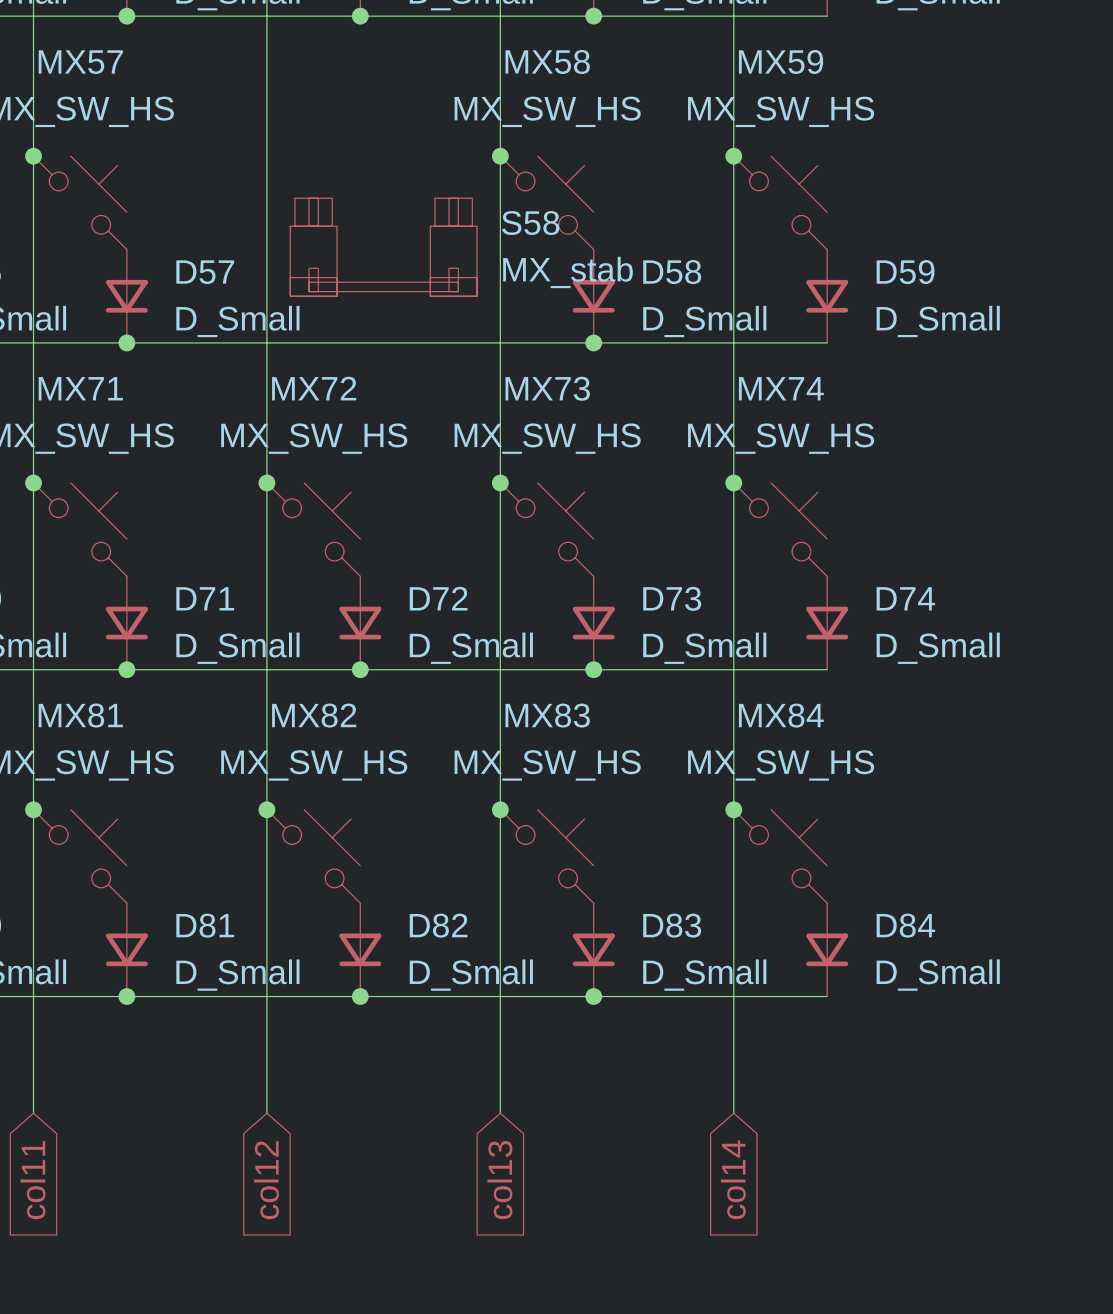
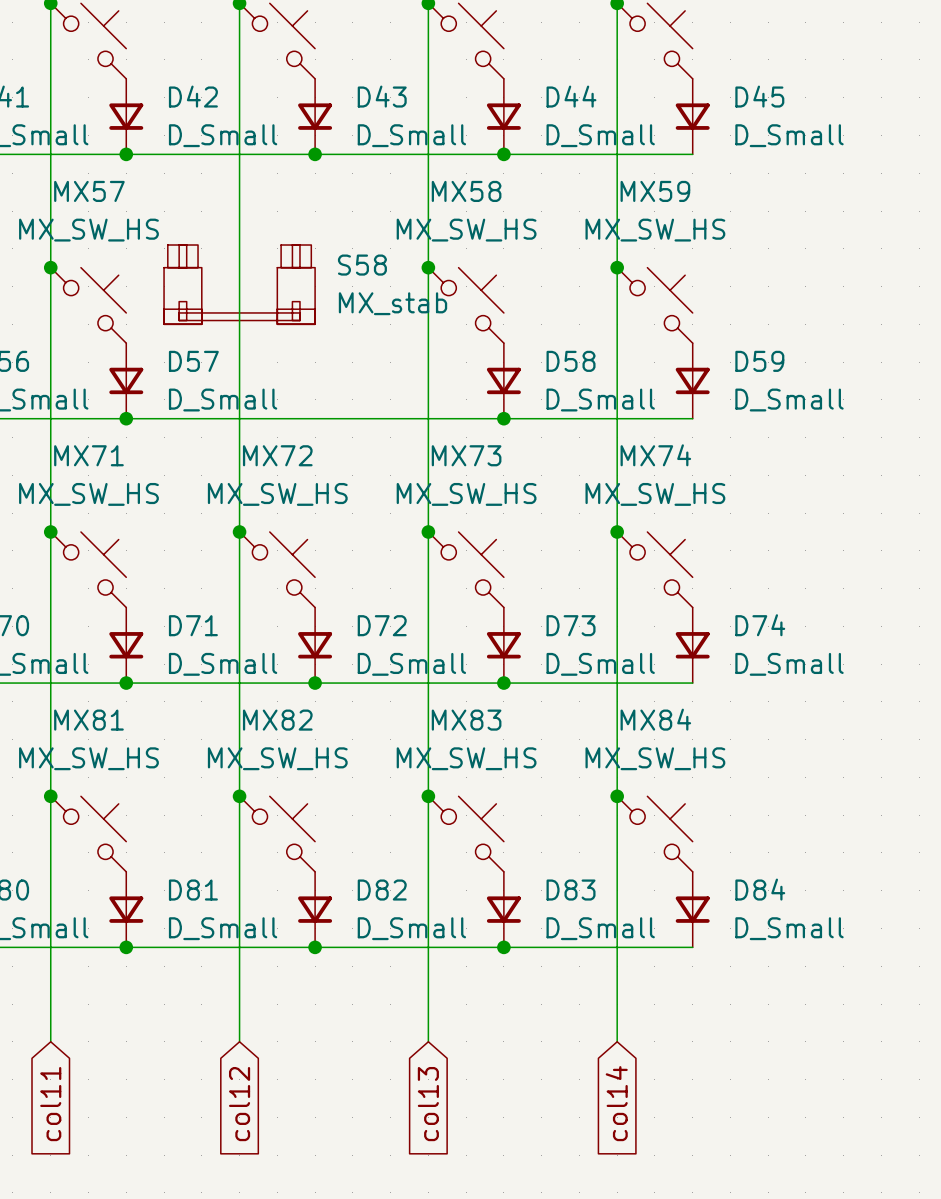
S58 position: (383, 247) -> (239, 284)

